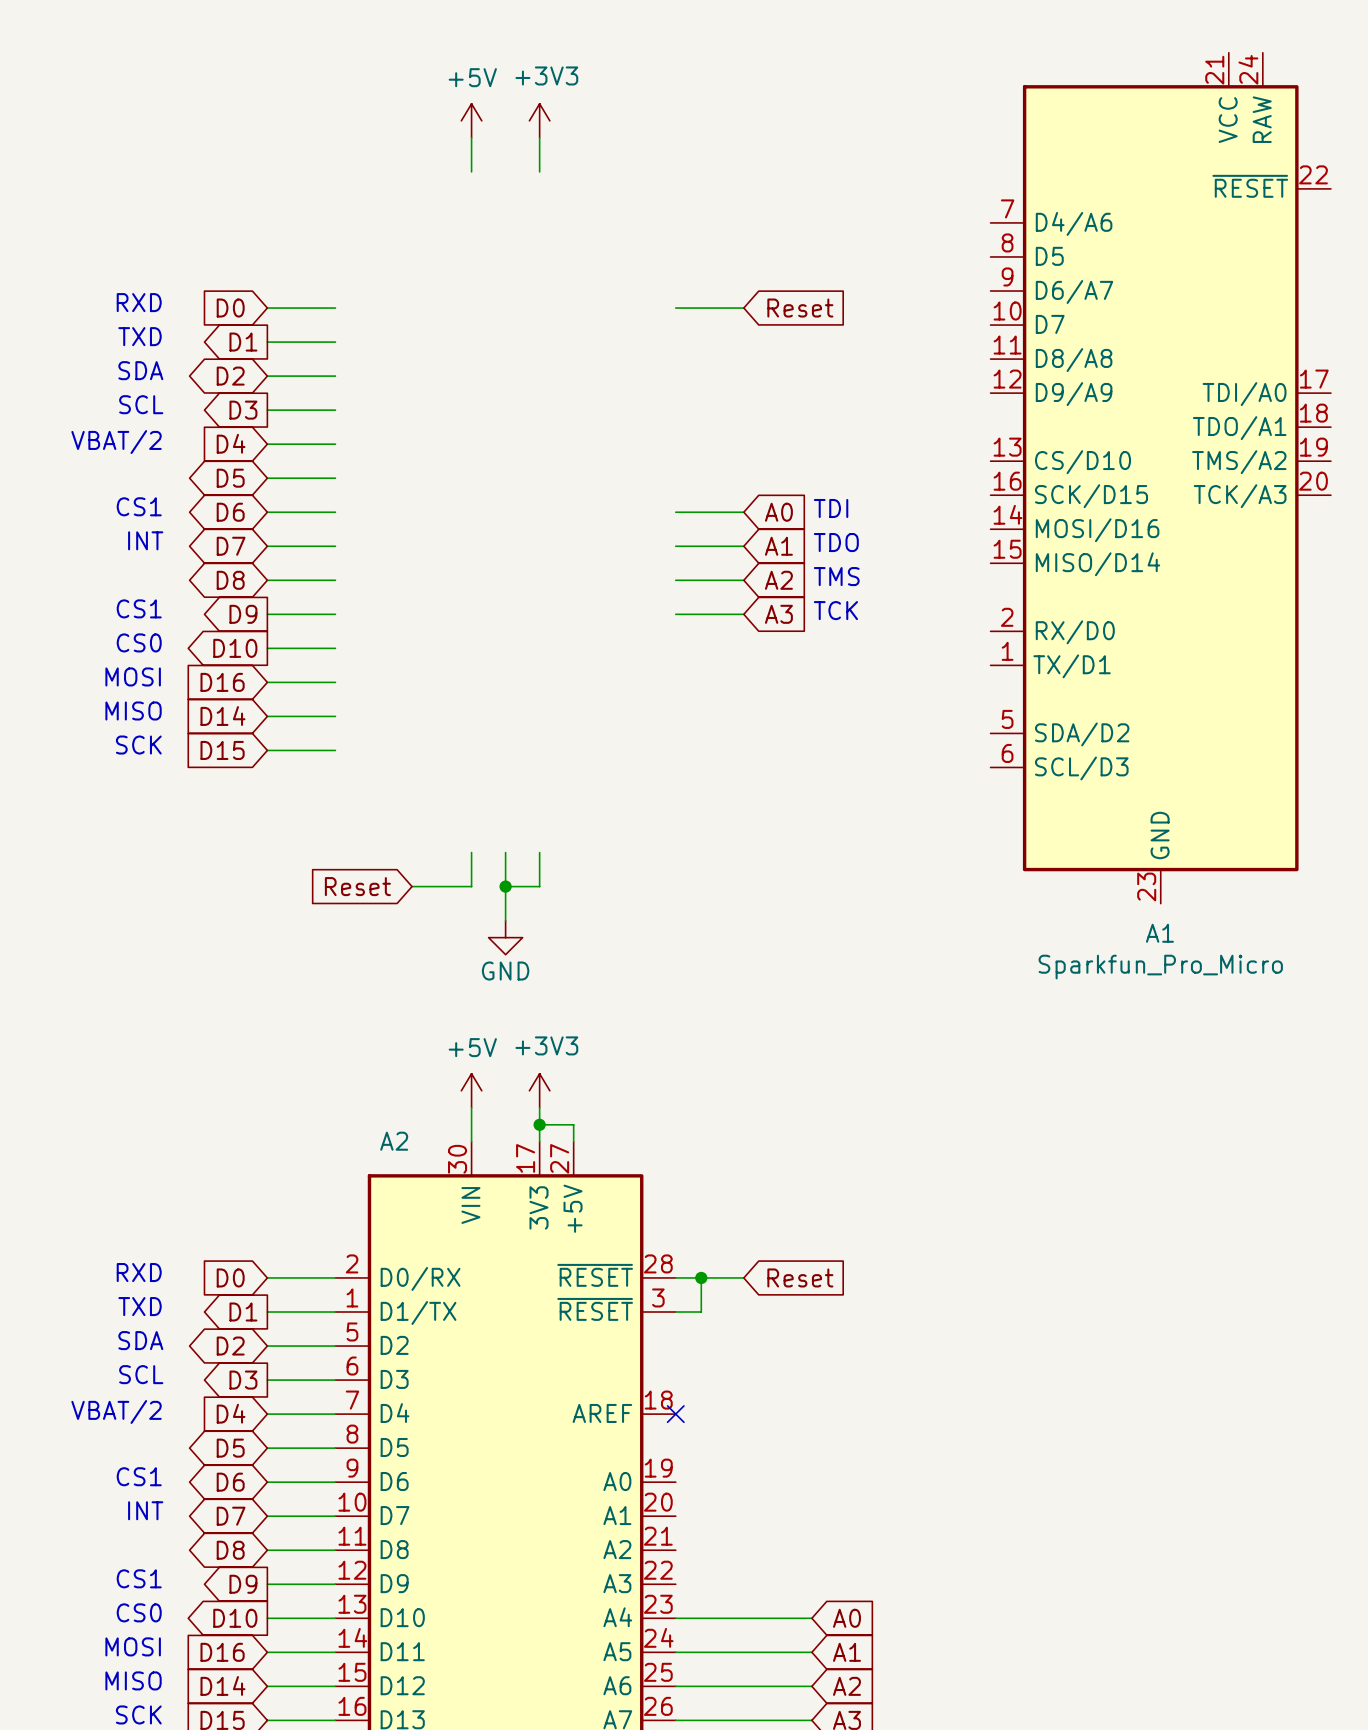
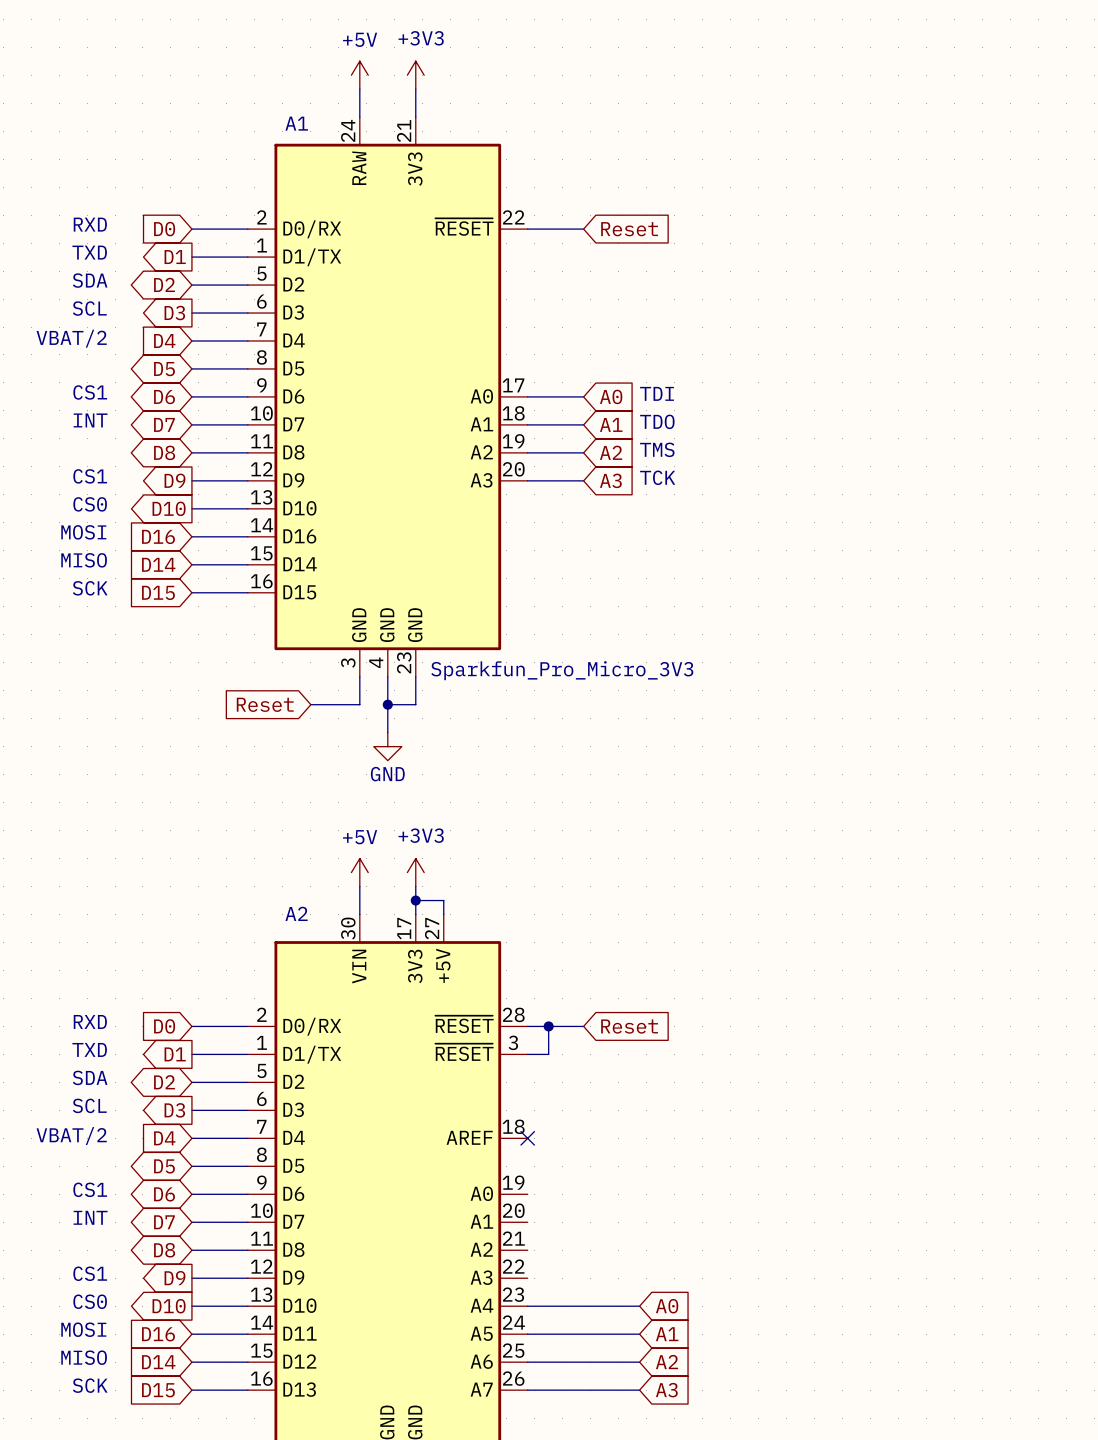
A1 symbol: [990, 52, 1331, 904] -> [247, 117, 528, 677]
A1 name position: A1 (1159, 933) -> A1 (296, 123)
A1 value: Sparkfun_Pro_Micro (1160, 967) -> Sparkfun_Pro_Micro_3V3 (562, 670)

